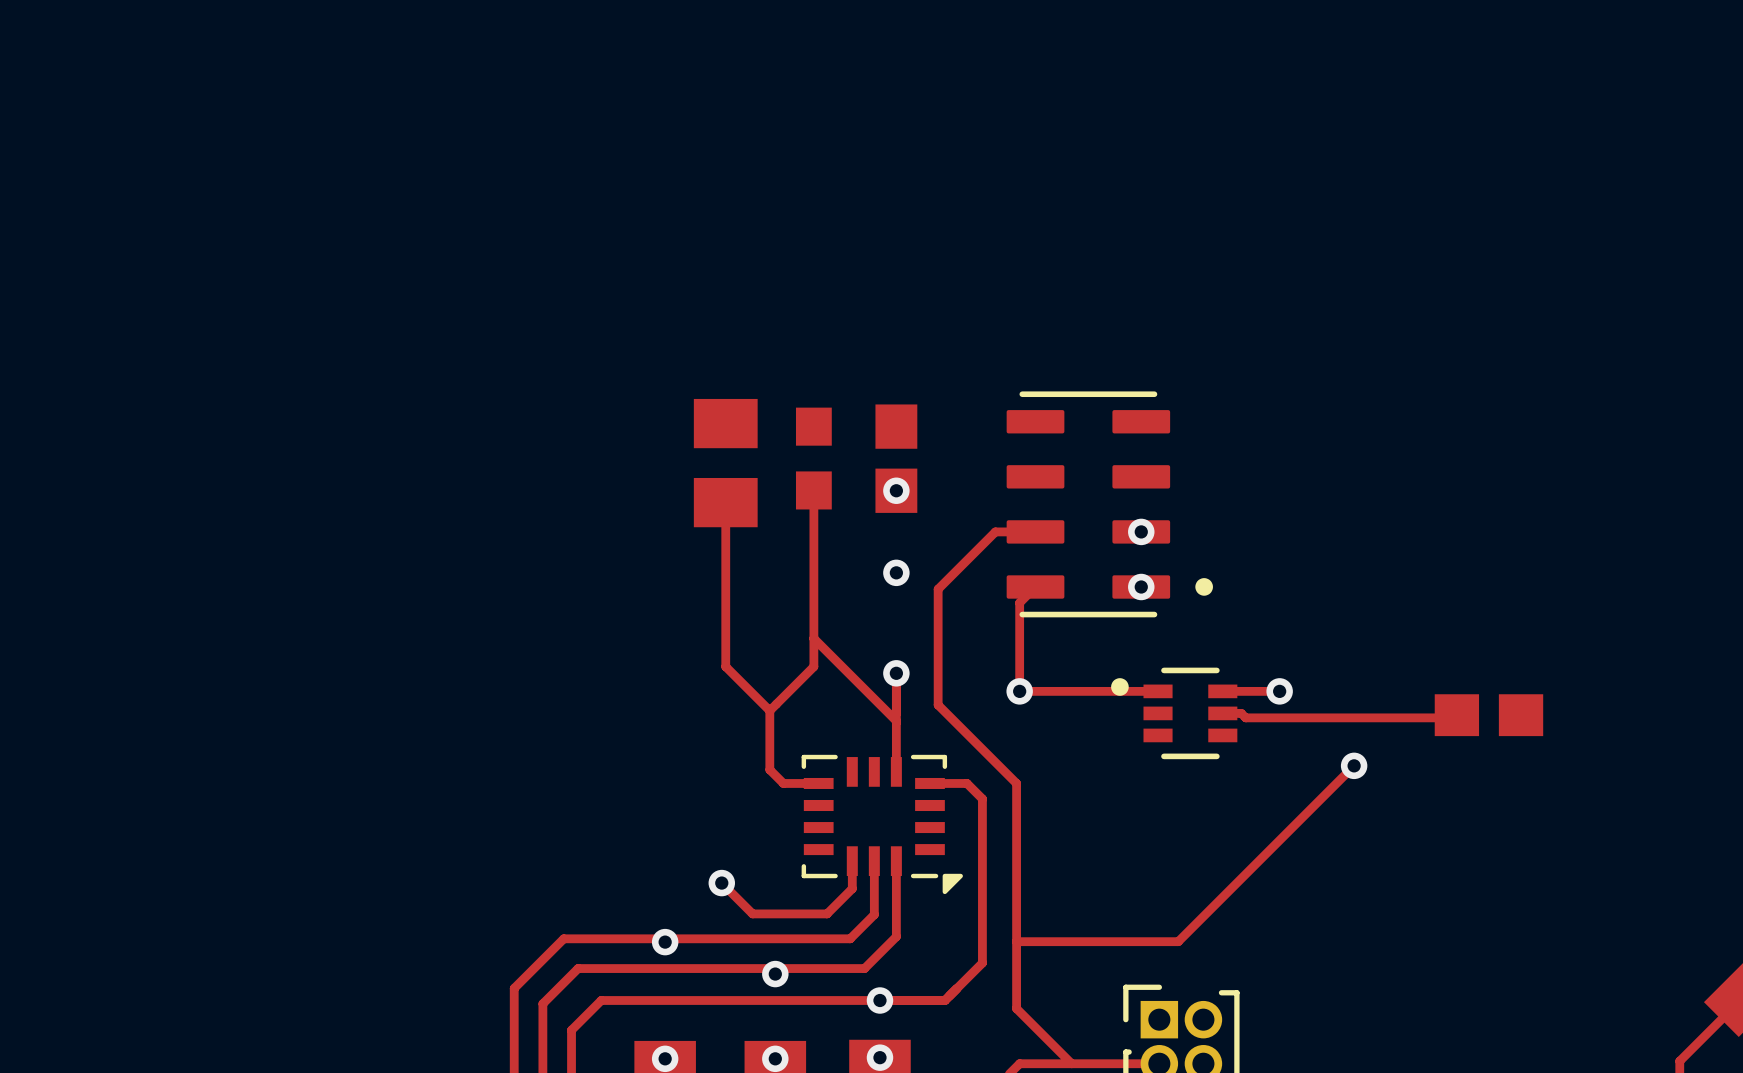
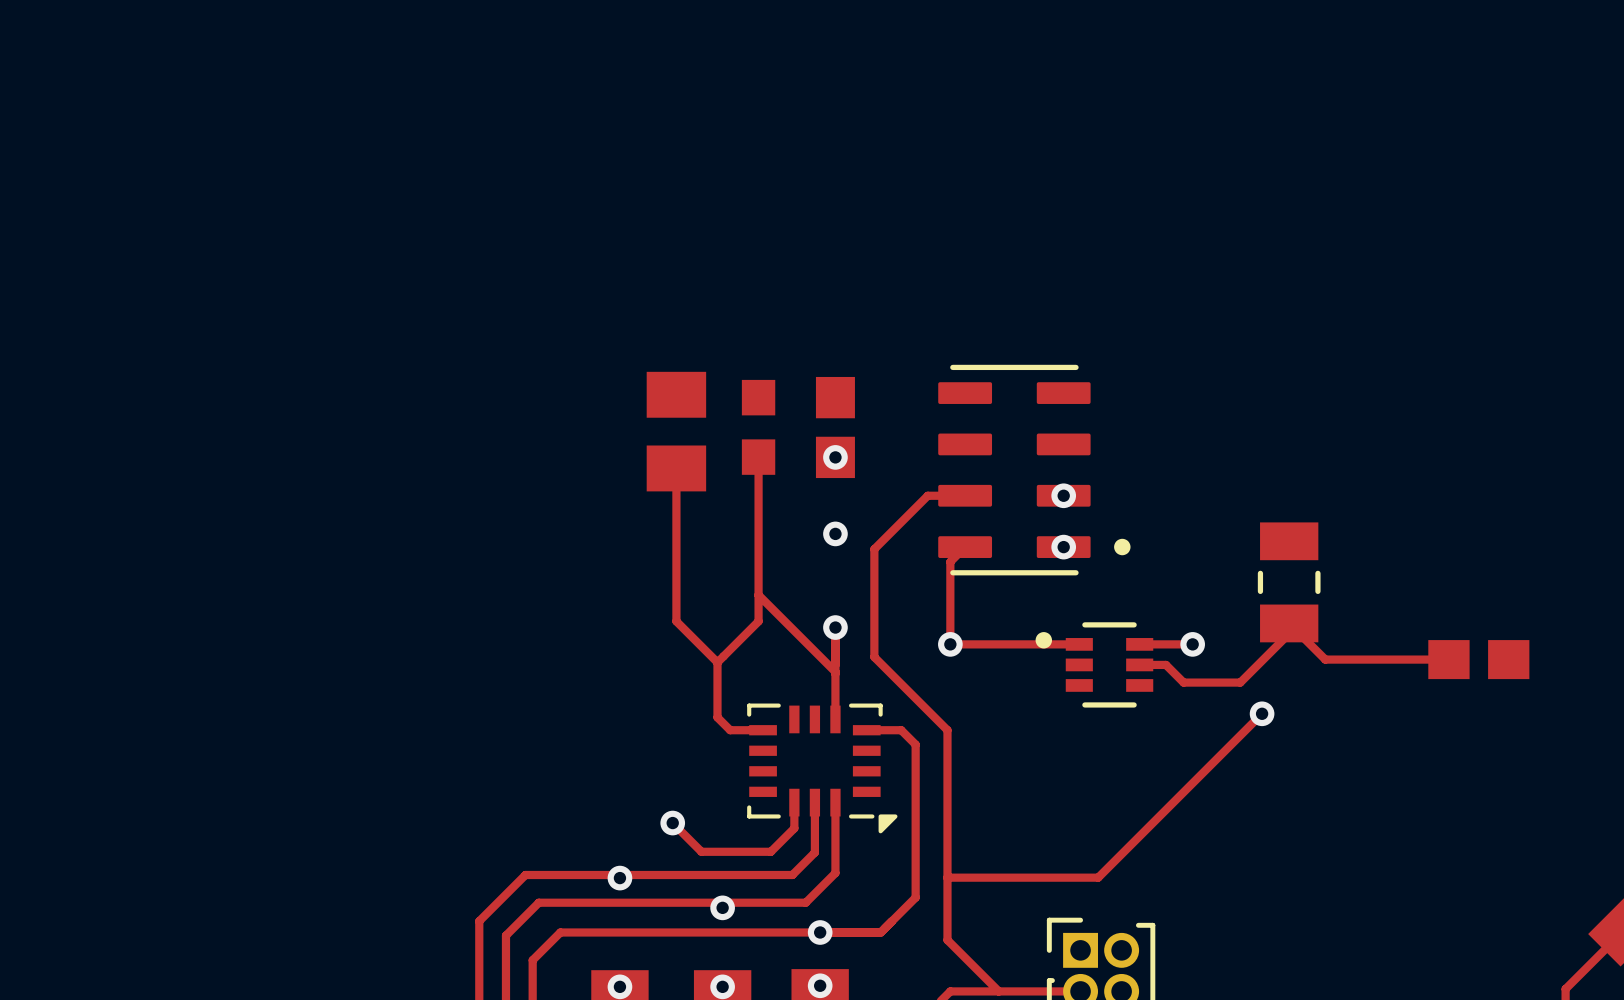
part: none -> (1289, 582)
track: (1456, 711) (1450, 717) (1245, 717) (1241, 713) -> (1448, 659) (1325, 659) (1289, 623) (1289, 633) (1240, 682) (1183, 682) (1165, 664) (1156, 664)
part position: (1488, 715) -> (1478, 659)

